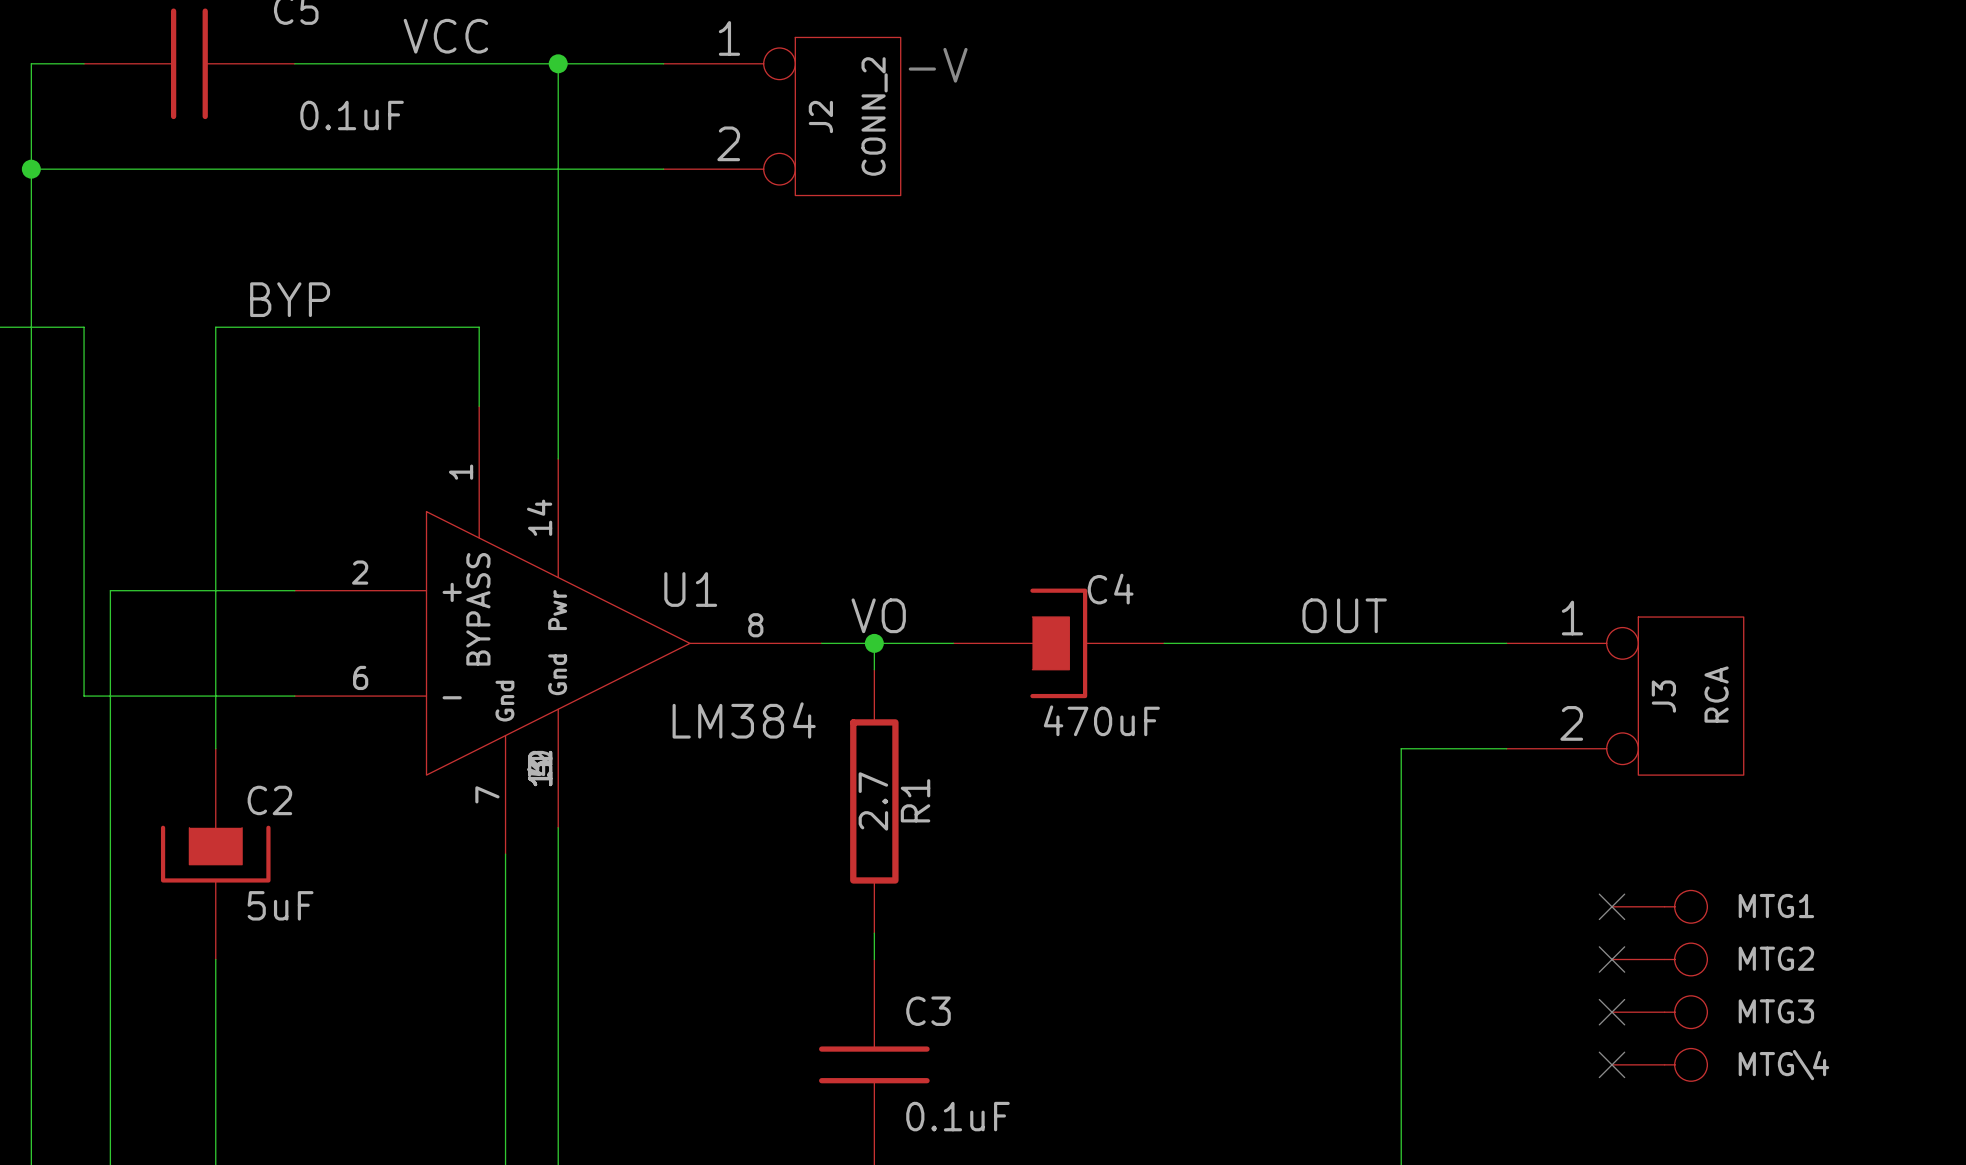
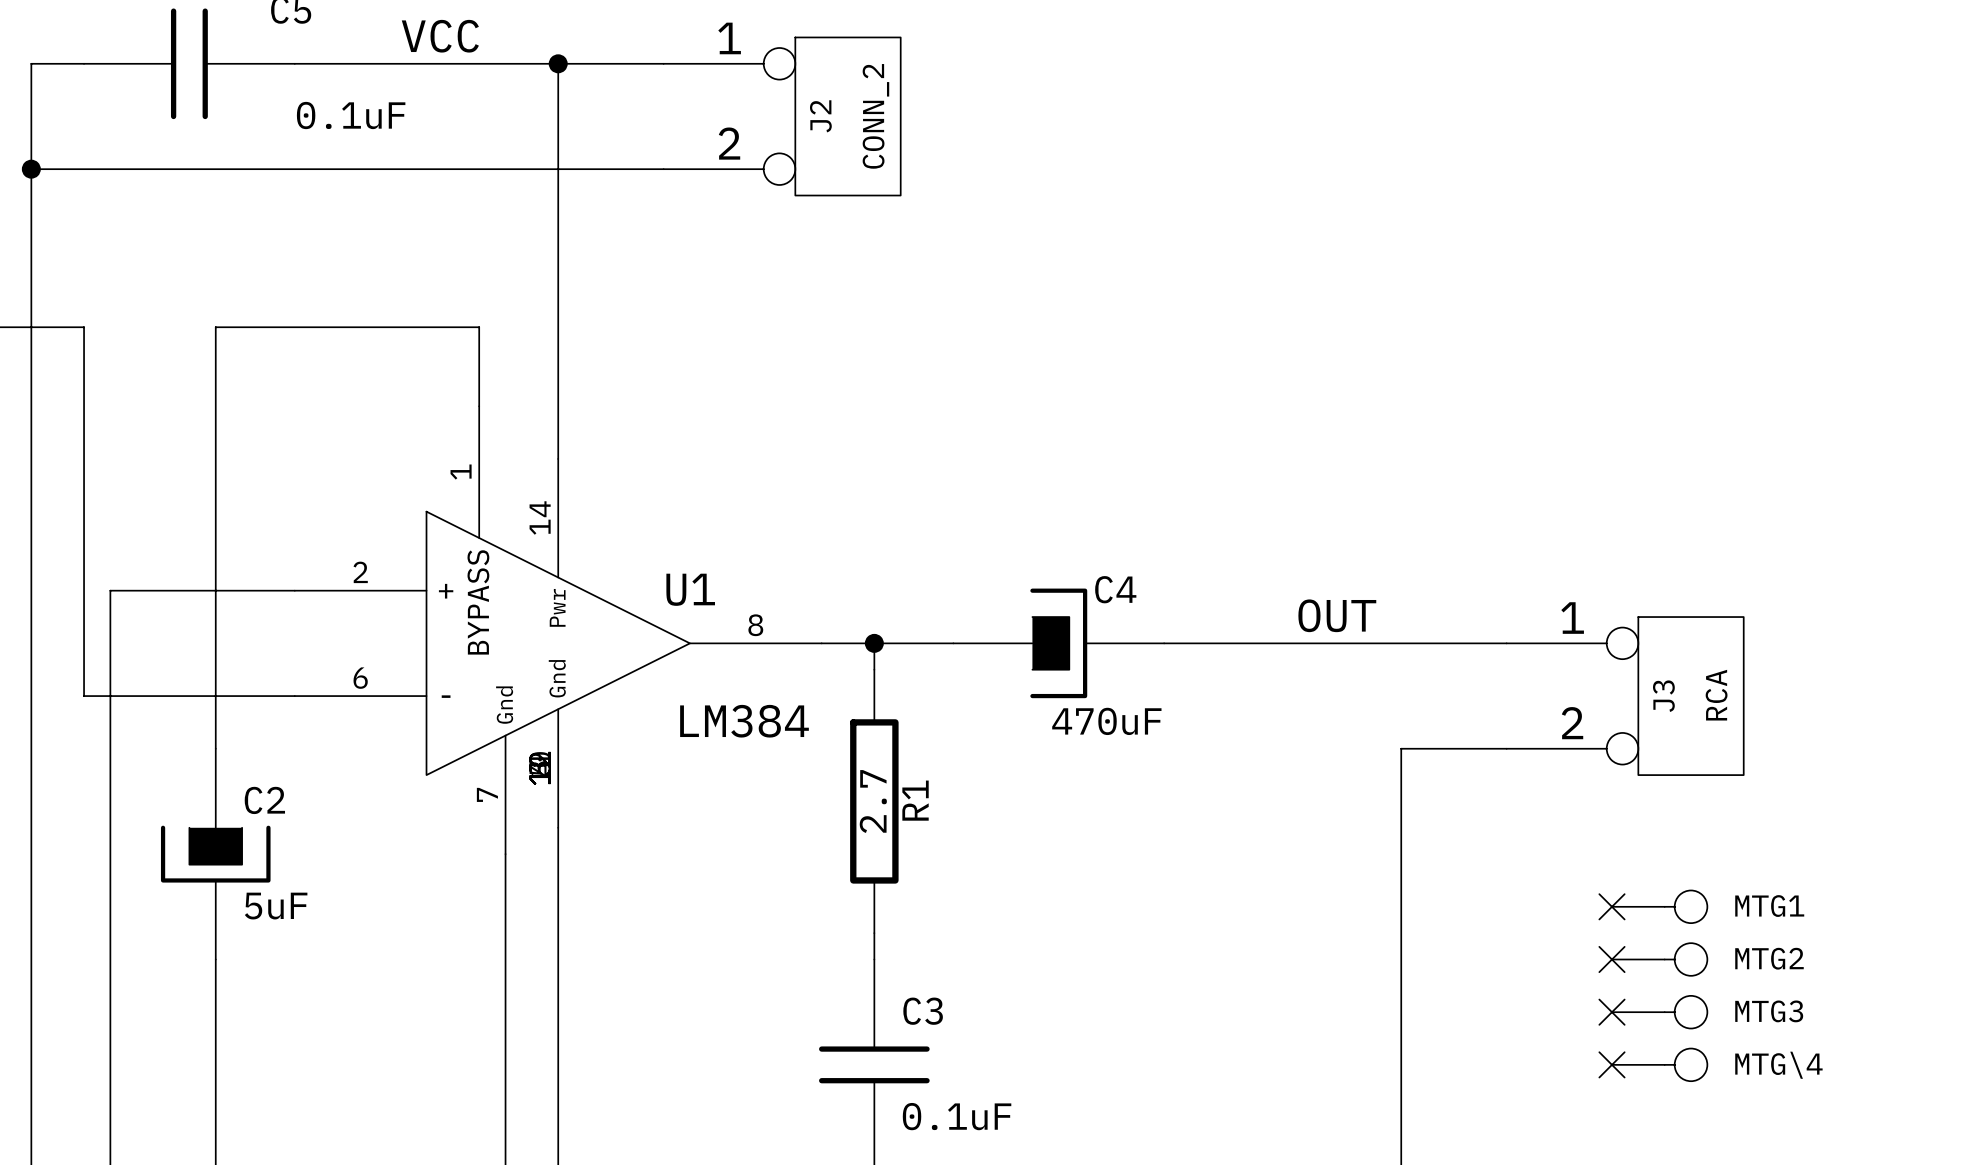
text: -V (938, 65) -> none
label: BYP (290, 299) -> none
label: VO (878, 615) -> none

